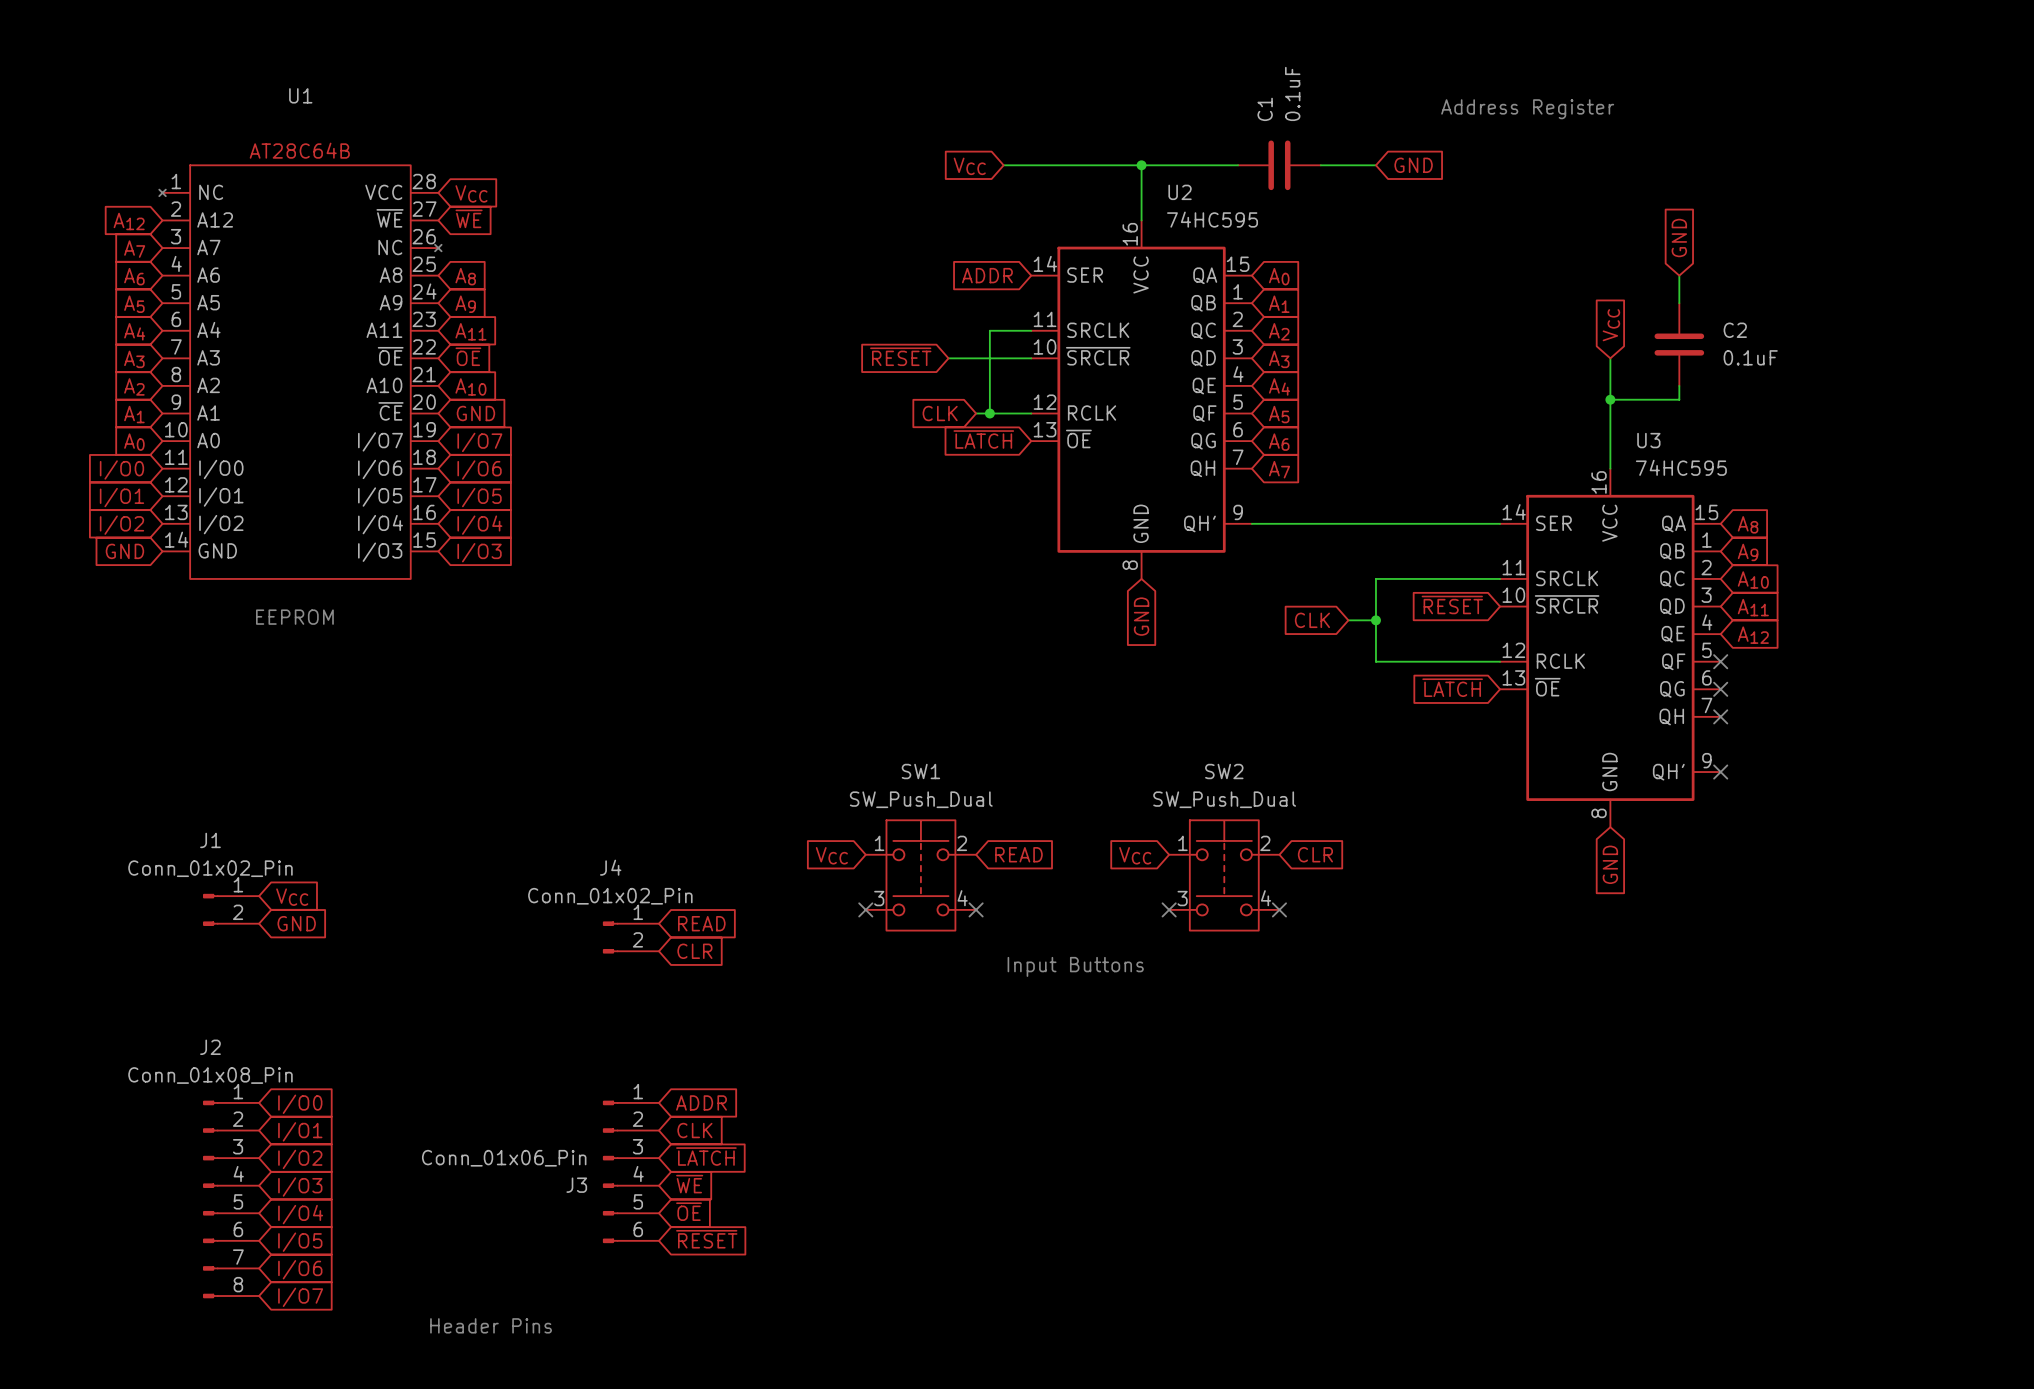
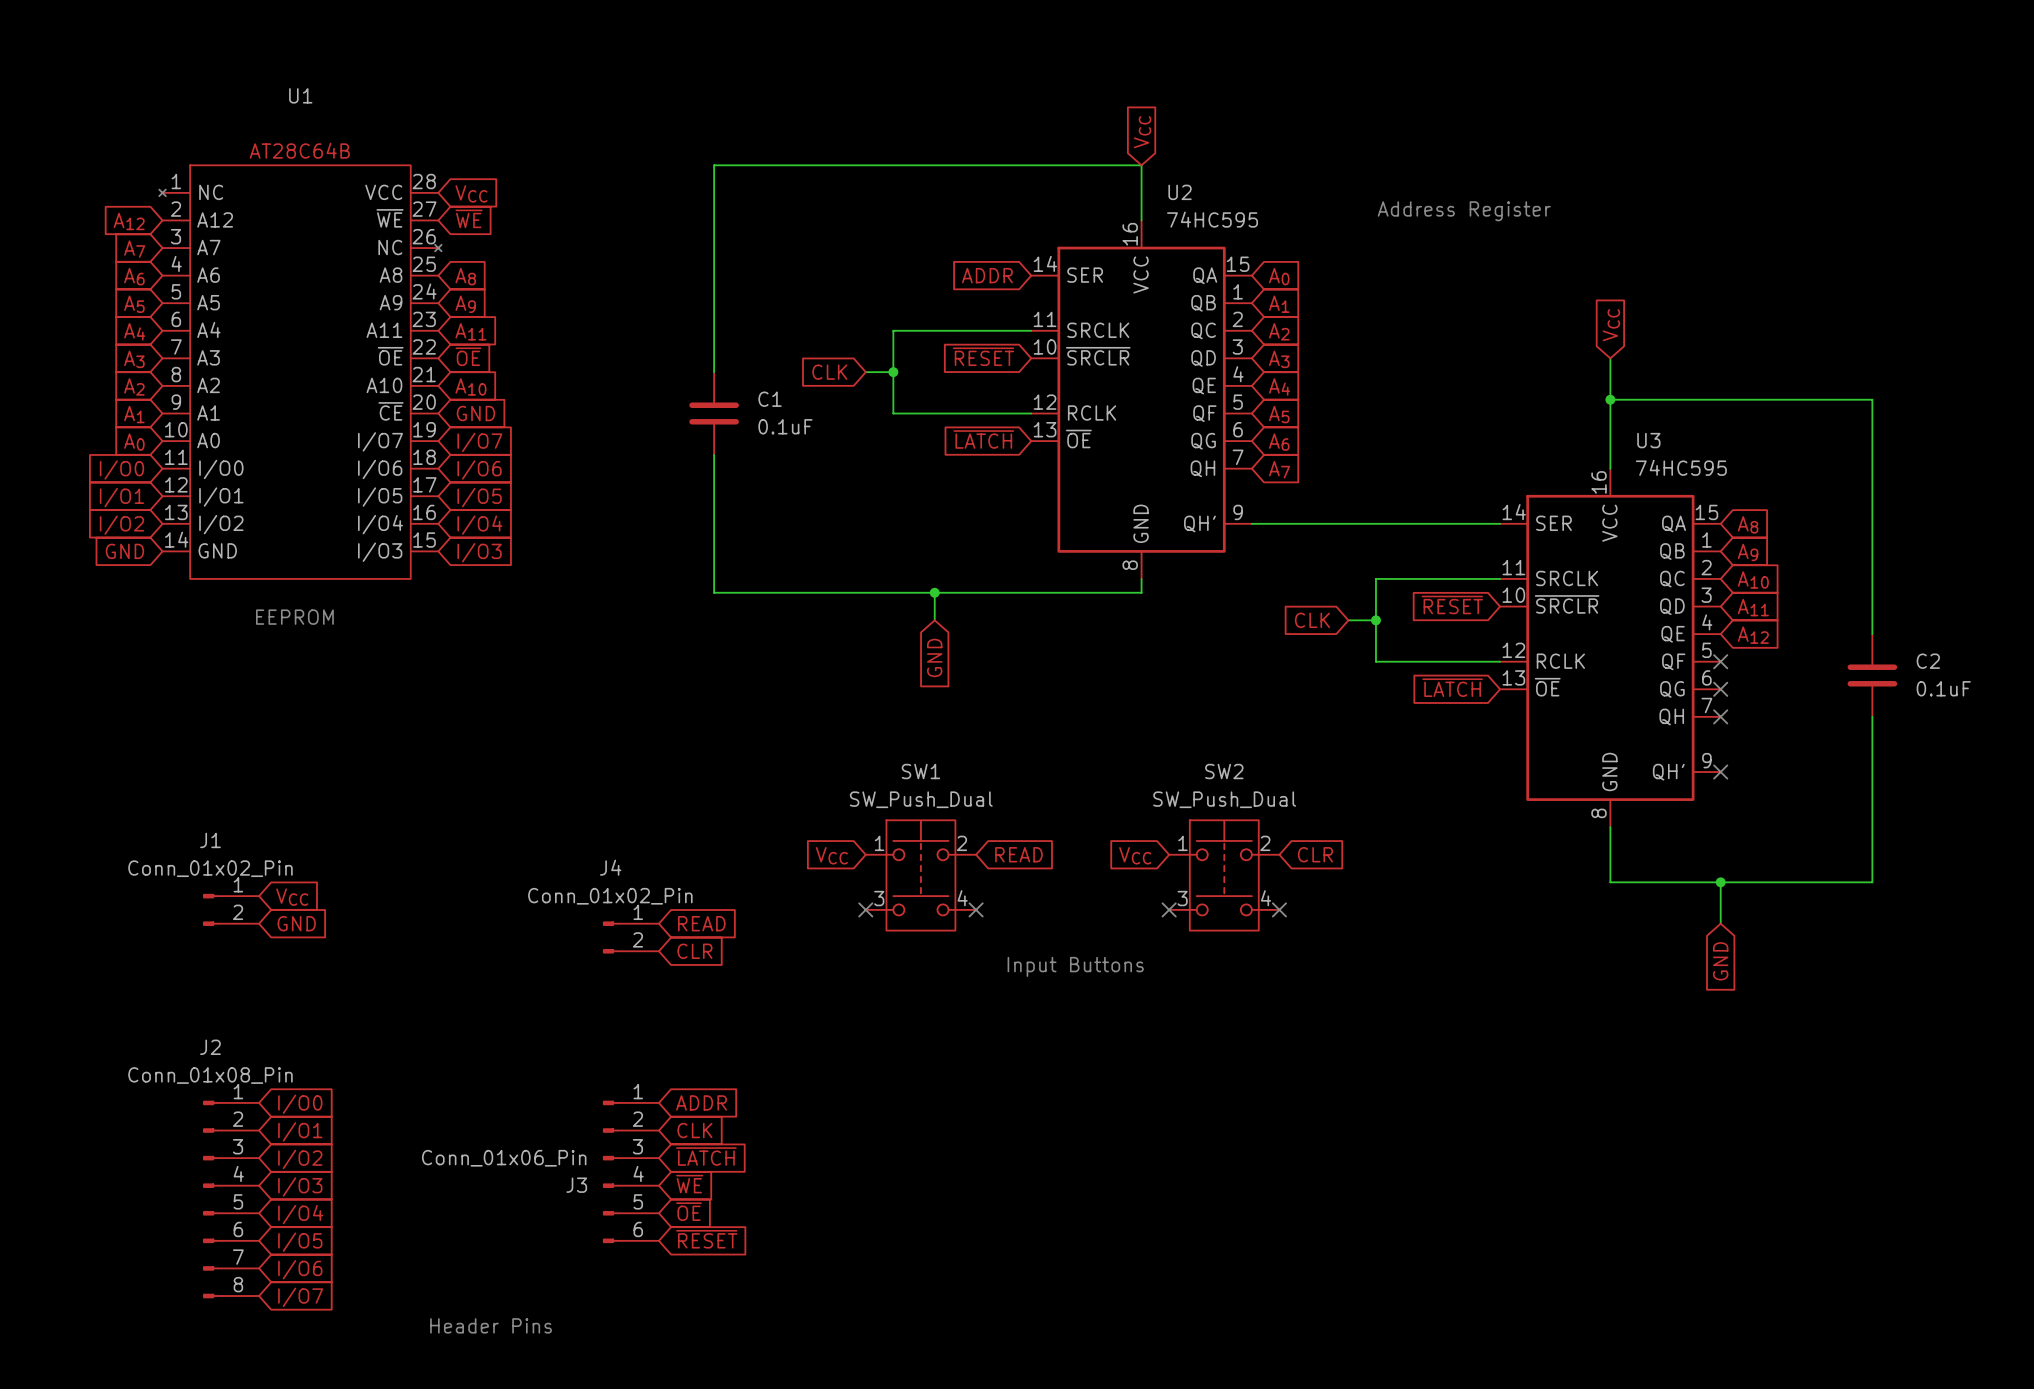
text position: Address Register (1527, 109) -> Address Register (1464, 211)
wire: none -> (1003, 165) (714, 165) (714, 372)
wire: (1141, 165) (1238, 165) -> none
junction: (1141, 165) -> none
C1 rotation: 0° (1279, 165) -> 90° clockwise (714, 413)
C1 position: (1279, 165) -> (714, 413)
wire: (1320, 165) (1375, 165) -> none
global label: GND (1413, 165) -> none
global label rotation: 0° (969, 166) -> 90° clockwise (1142, 132)
global label position: VCC (969, 166) -> VCC (1142, 132)
global label: GND (1679, 238) -> none
wire: (1679, 275) (1679, 303) -> none
wire: (989, 330) (989, 413) -> (989, 330) (893, 330) (893, 413) (976, 413)
C2 position: (1679, 344) -> (1872, 675)
global label position: ~{RESET} (900, 356) -> ~{RESET} (983, 356)
wire: (948, 358) (1031, 358) -> none
junction: none -> (893, 372)
wire: (1679, 385) (1679, 399) -> (1872, 634) (1872, 399) (1679, 399)
global label position: CLK (940, 413) -> CLK (829, 372)
junction: (989, 413) -> none
wire: none -> (714, 454) (714, 592) (1141, 592) (1141, 578)
wire: none -> (934, 592) (934, 620)
junction: none -> (934, 592)
global label position: GND (1141, 616) -> GND (934, 657)
wire: none -> (1872, 716) (1872, 882) (1610, 882) (1610, 827)
global label position: GND (1610, 864) -> GND (1720, 961)
wire: none -> (1720, 882) (1720, 923)
junction: none -> (1720, 882)

